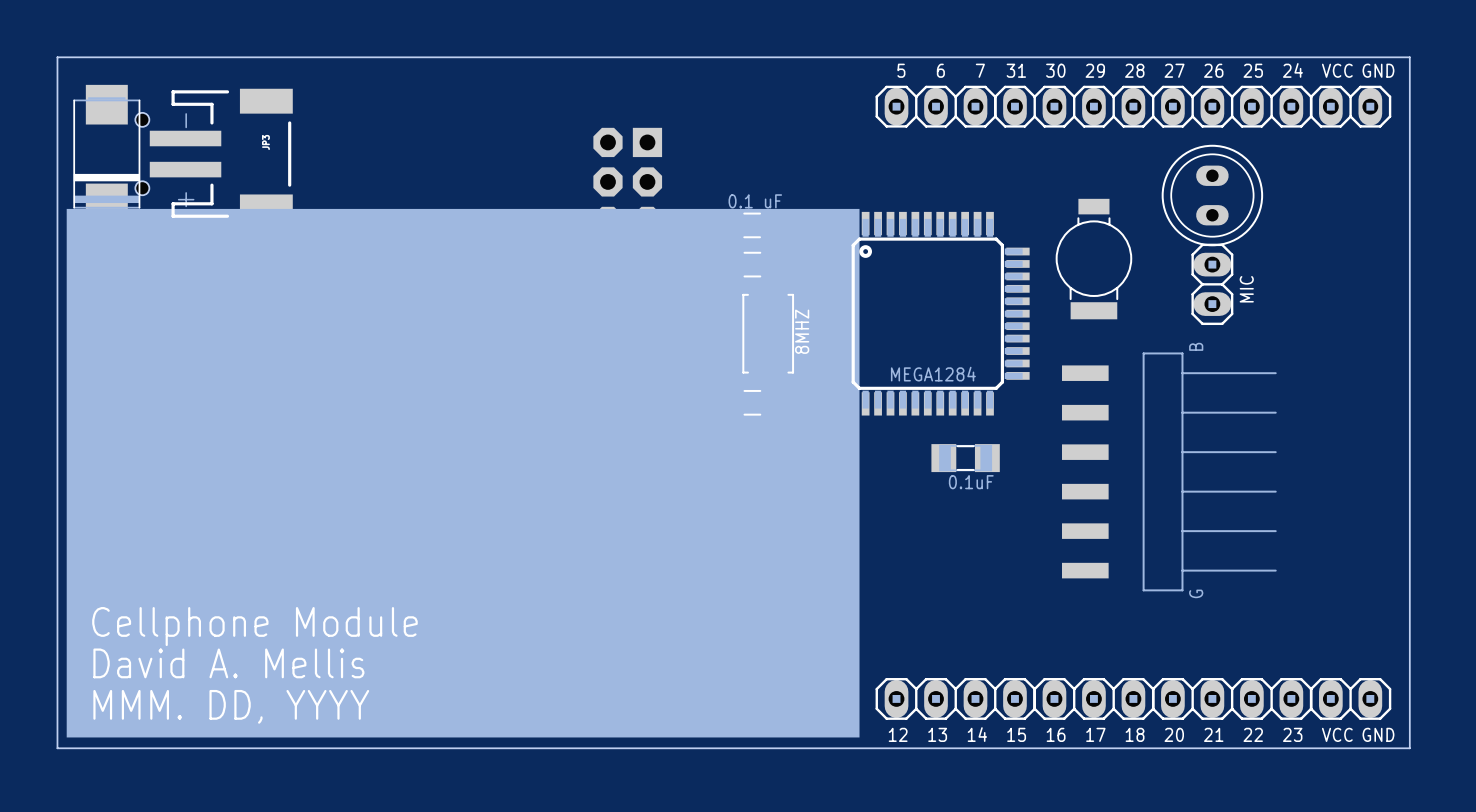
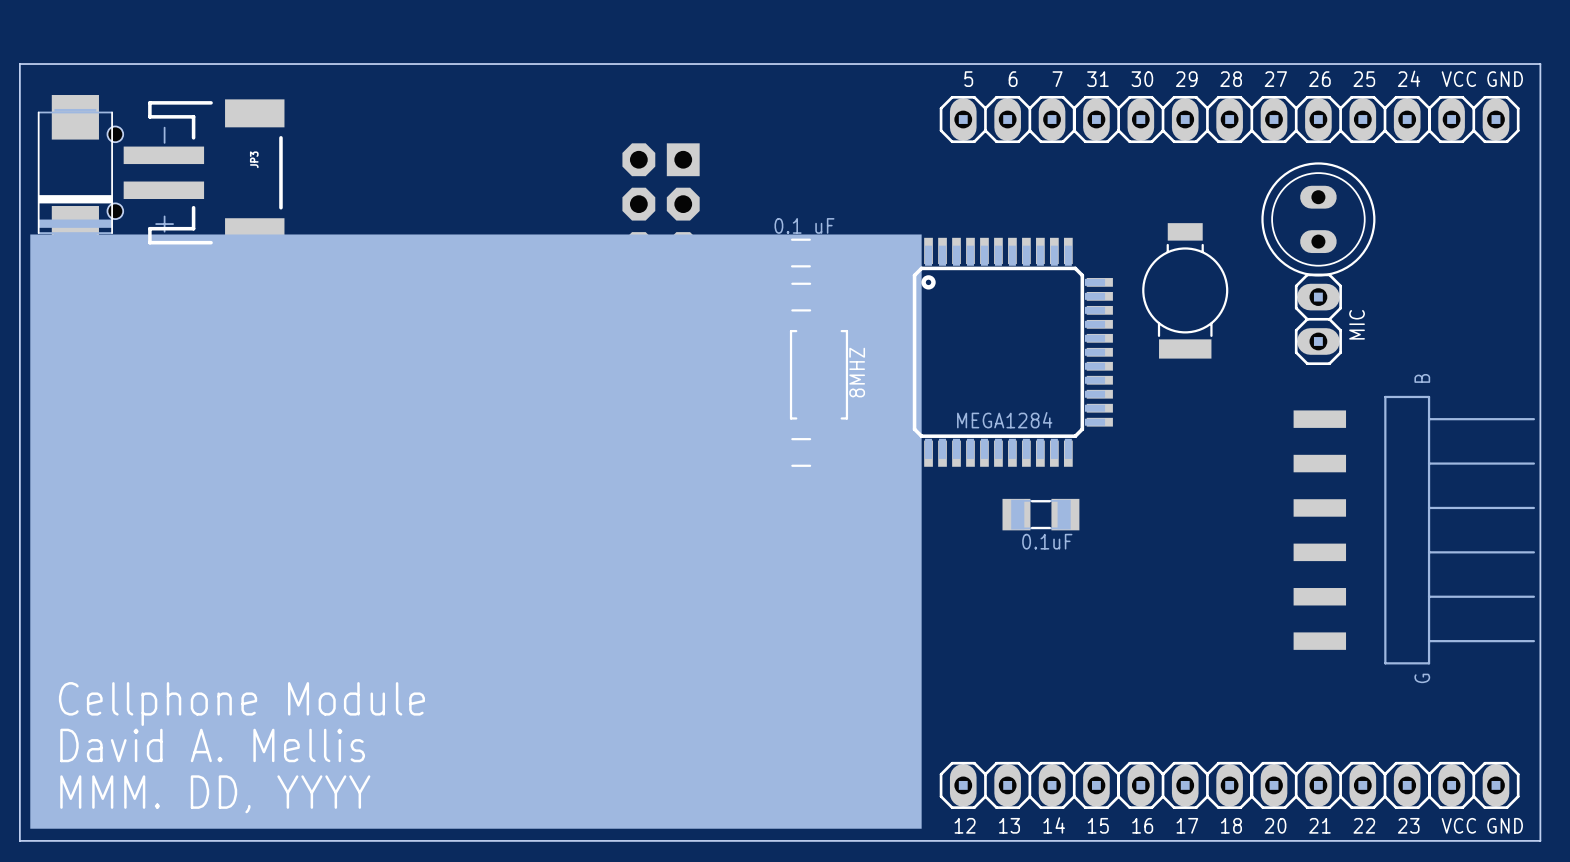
text position: B (1196, 346) -> B (1422, 378)
part position: (1169, 471) -> (1414, 530)
text position: G (1196, 593) -> G (1422, 678)

